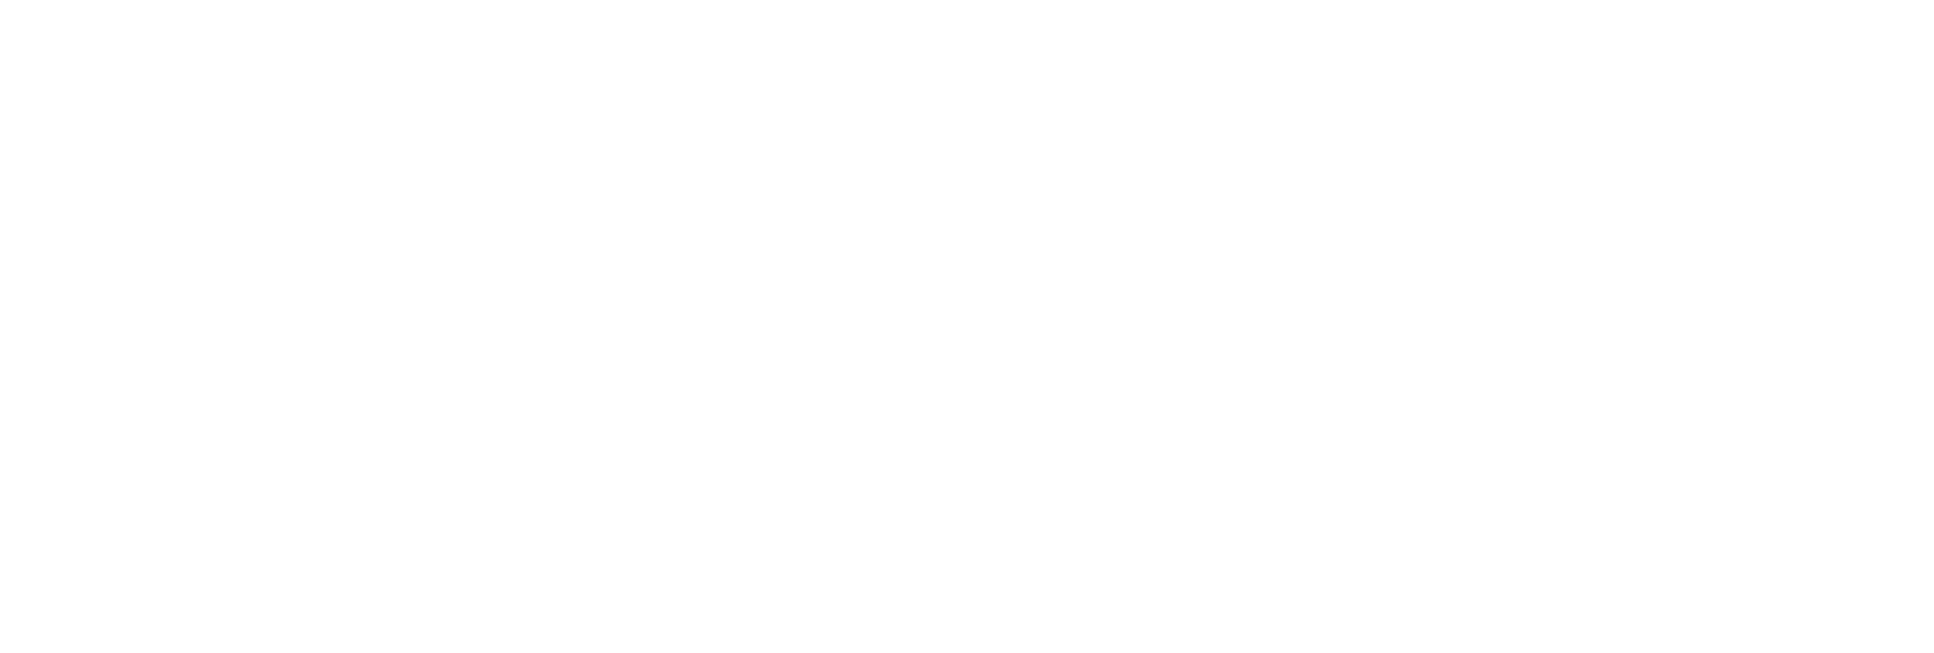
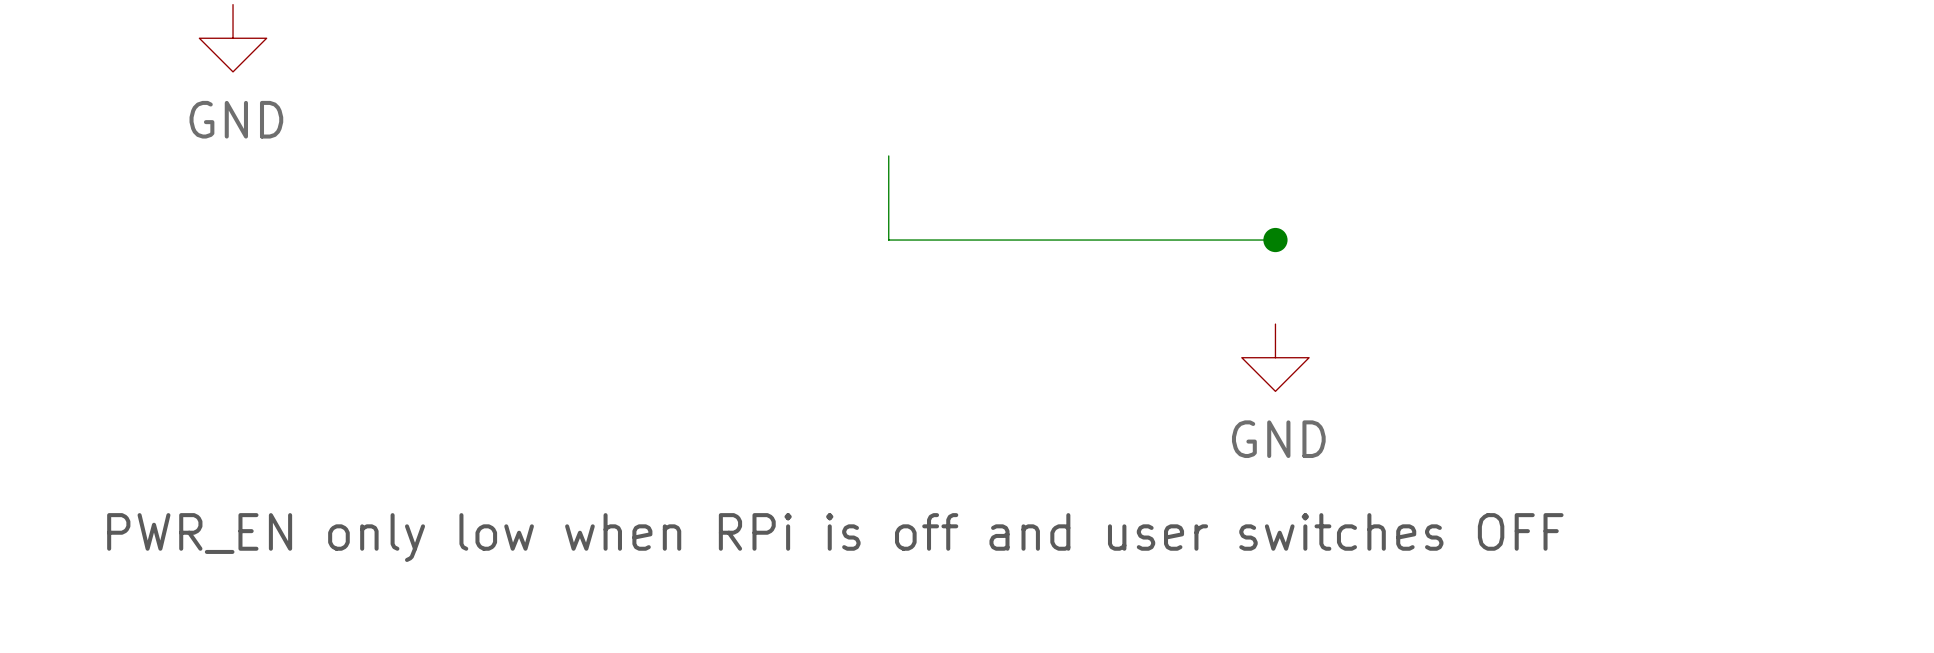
power symbol: none -> GND (233, 38)
wire: none -> (888, 155) (888, 240) (1275, 240)
junction: none -> (1275, 240)
power symbol: none -> GND (1275, 357)
text: none -> PWR_EN only low when RPi is off and user switches OFF (835, 537)

